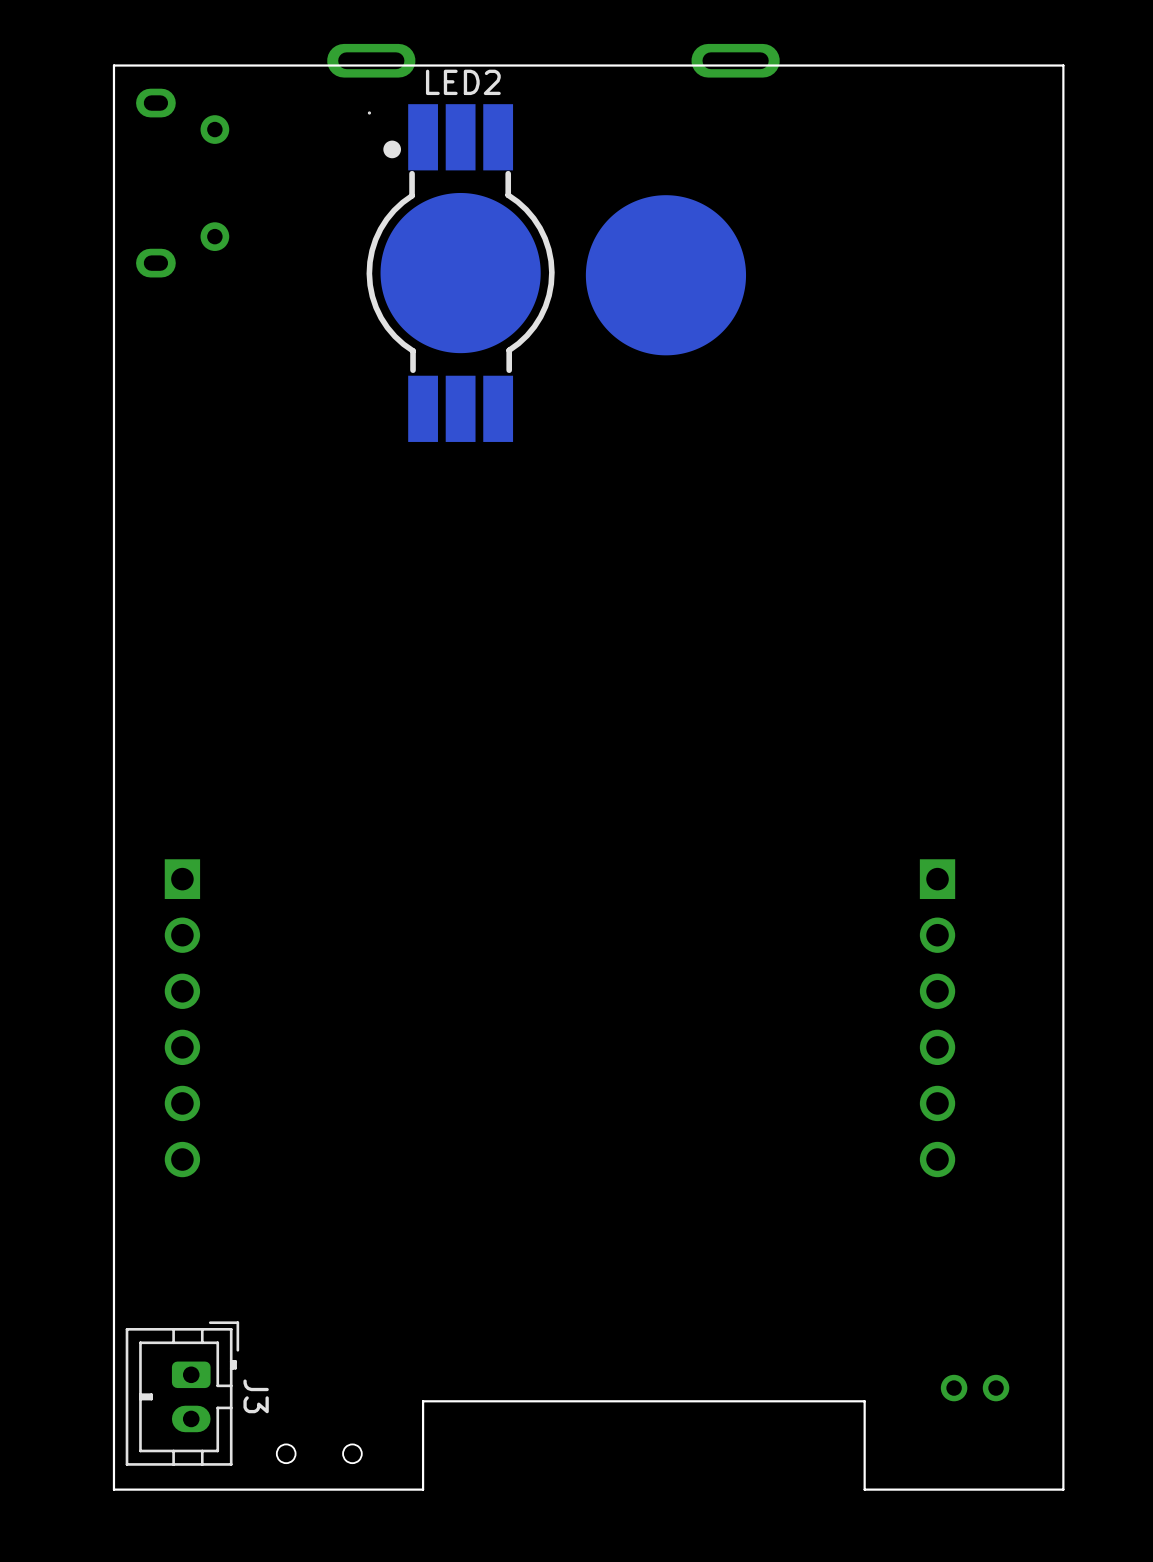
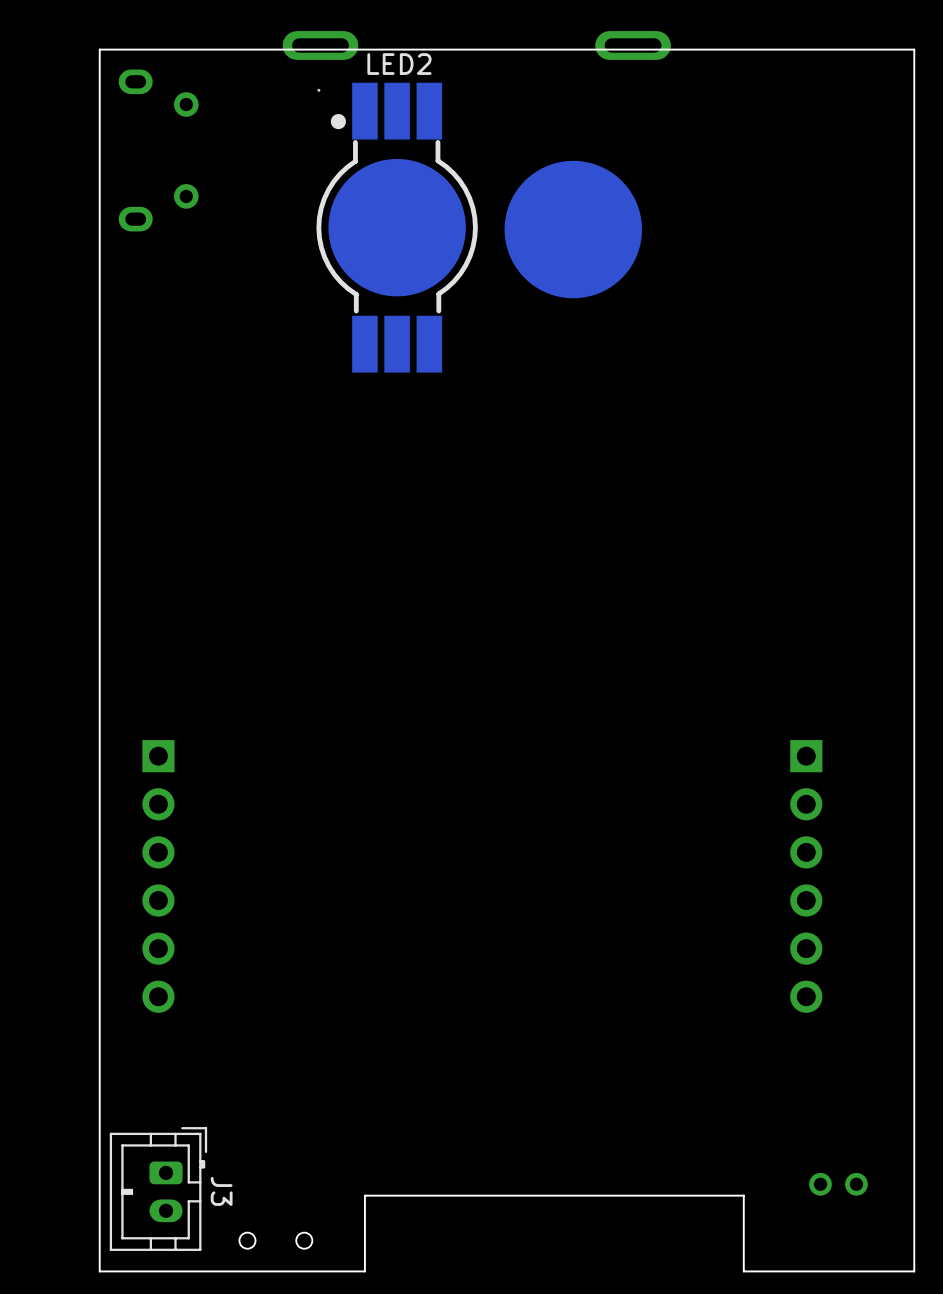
part footprint: [164, 859, 201, 1178] -> [142, 740, 175, 1013]
part footprint: [919, 859, 956, 1178] -> [790, 740, 823, 1013]

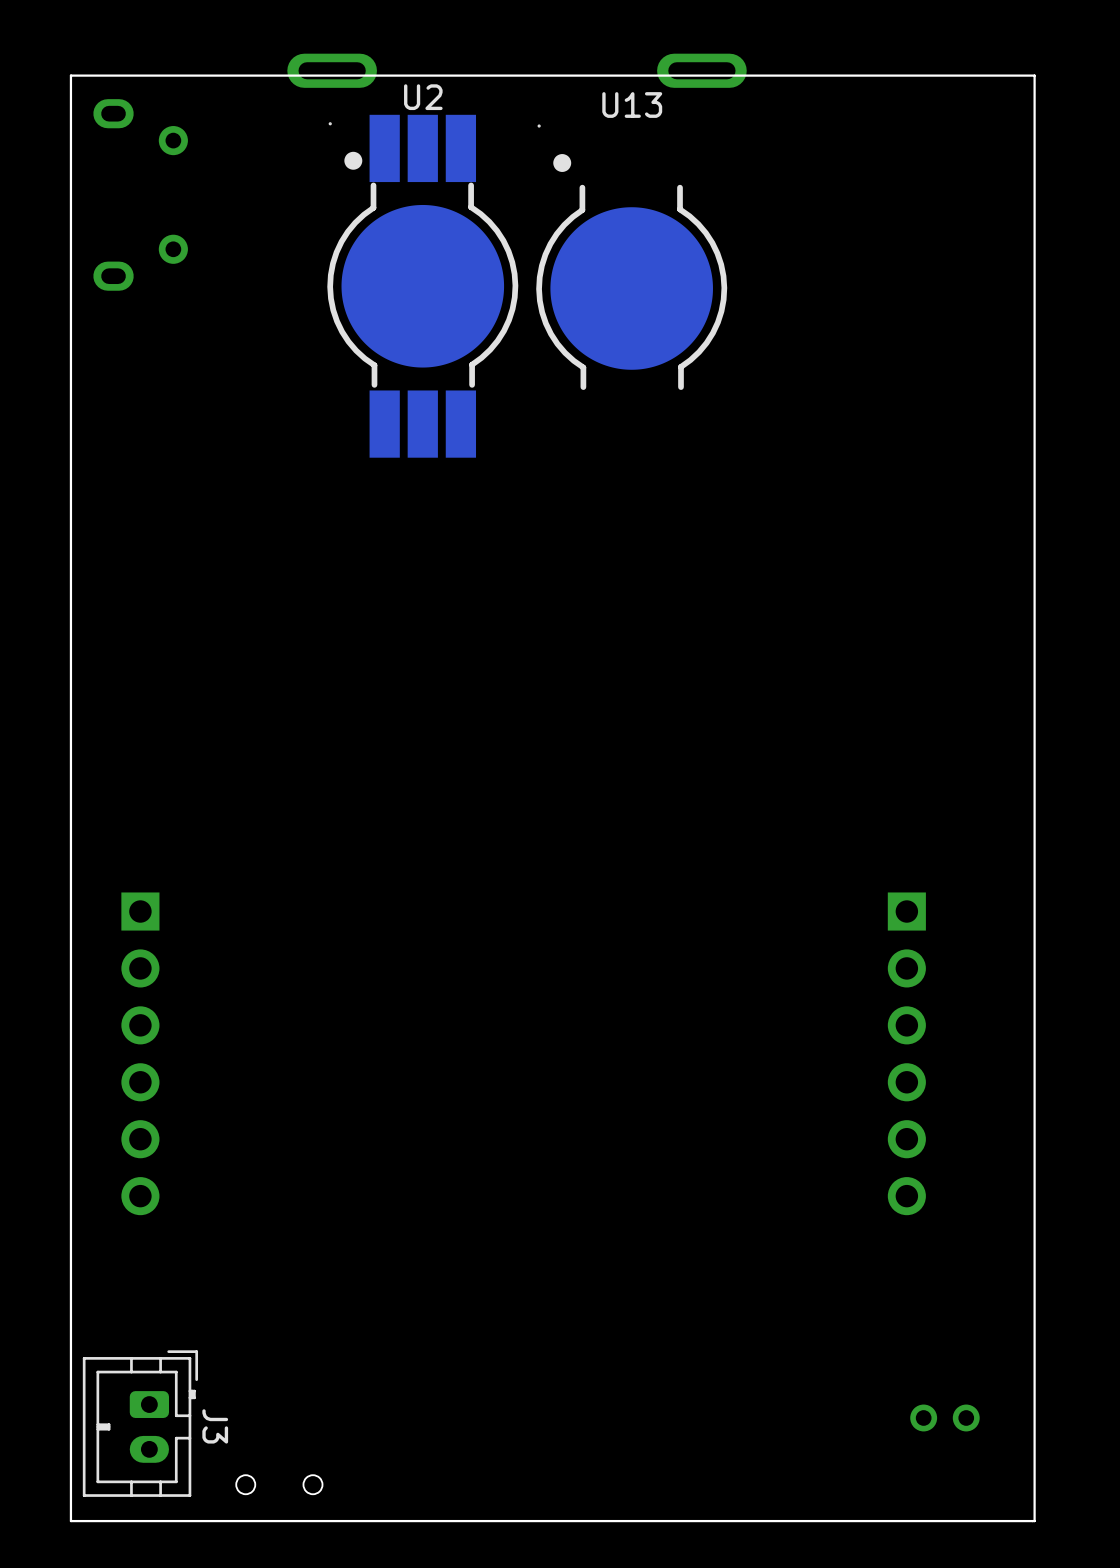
LED2 name: LED2 (399, 64) -> U2 (423, 97)
U13: none -> (631, 257)
part: (573, 229) -> none
board edge: (743, 1271) (743, 1195) (364, 1195) (364, 1271) -> (832, 1521) (384, 1521)

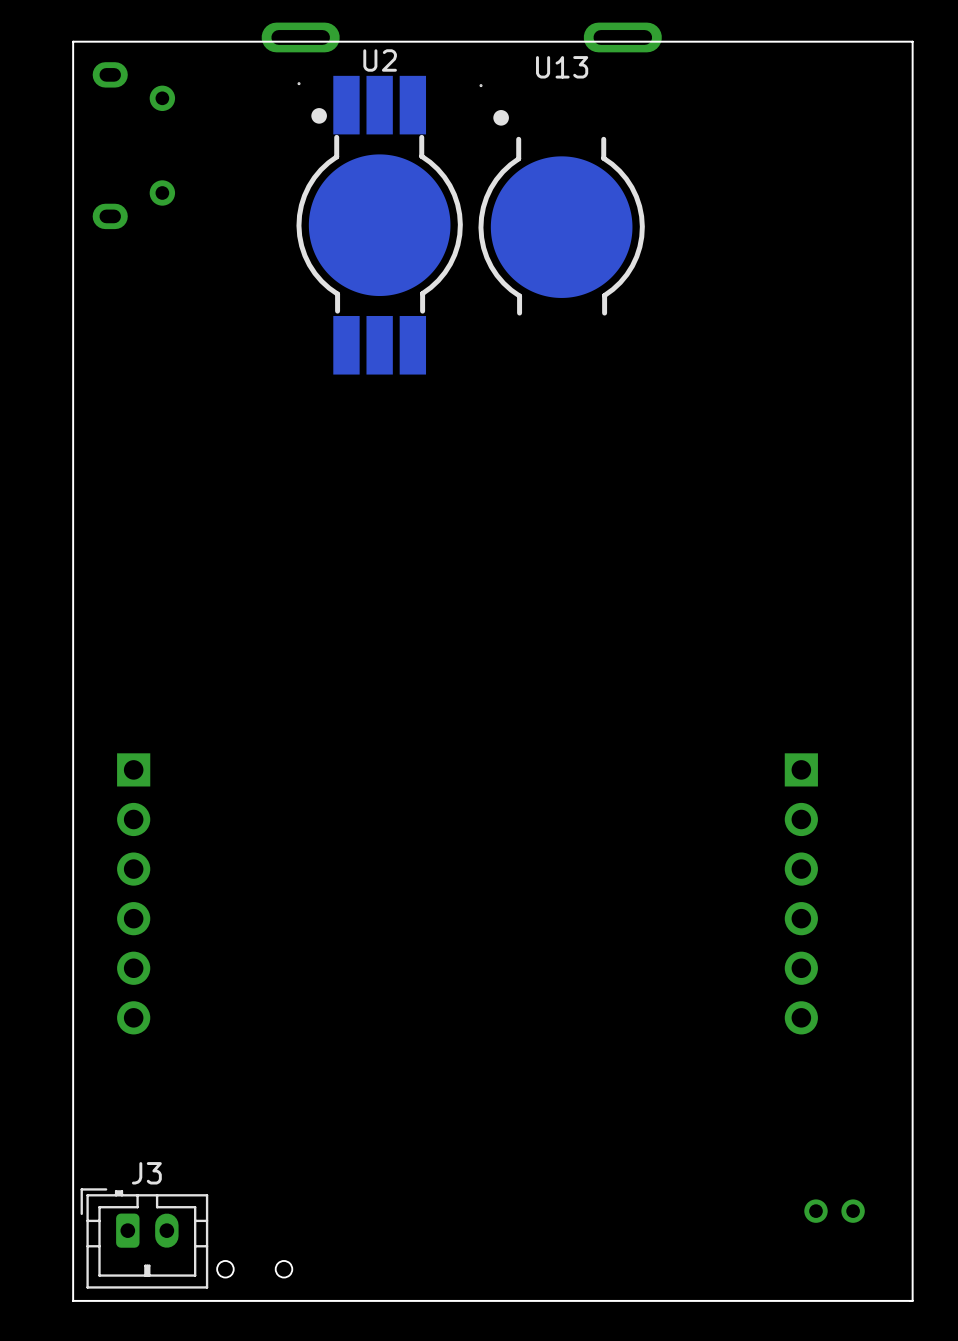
J3 rotation: 0° (140, 1423) -> 90° counterclockwise (144, 1238)

